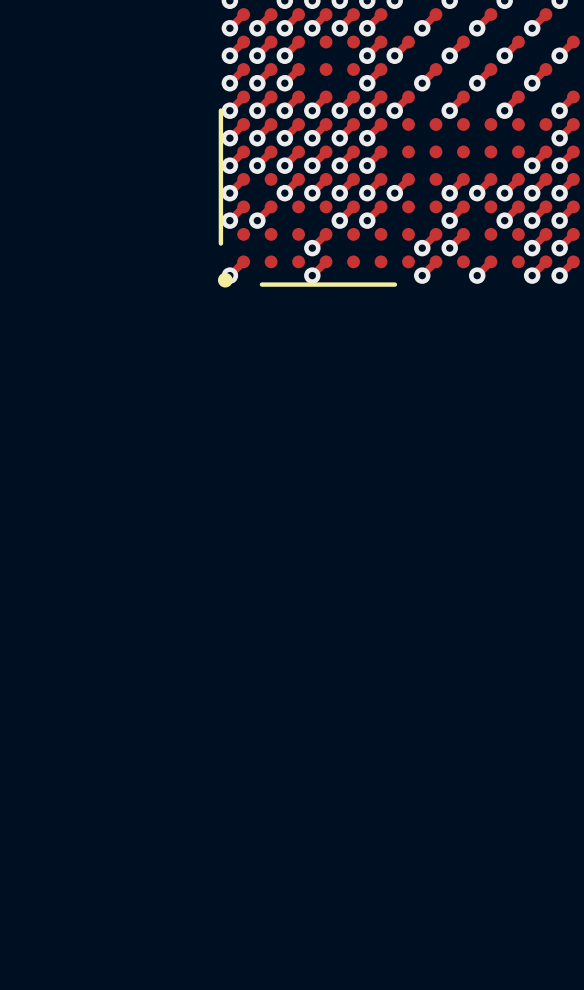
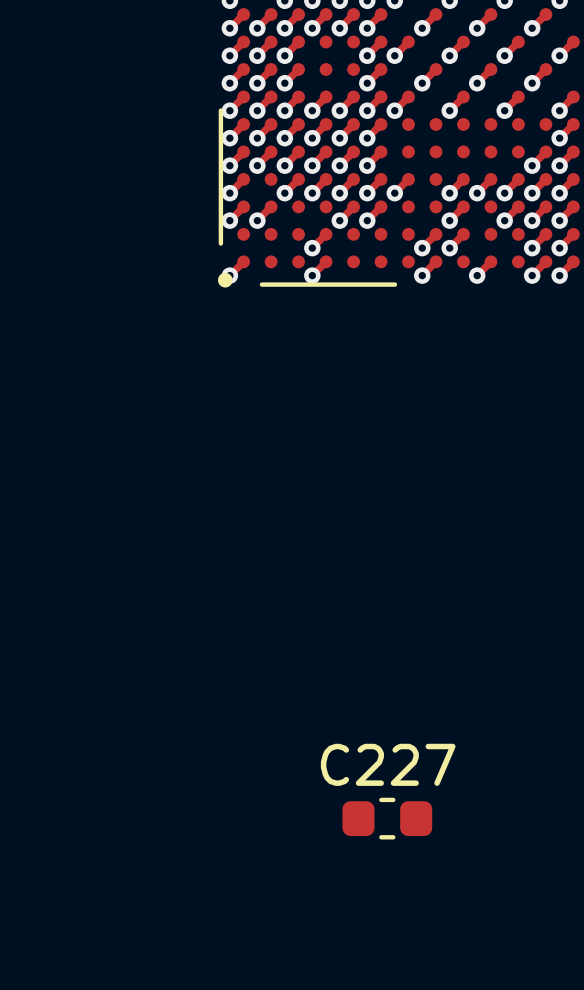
C227: none -> (387, 818)

